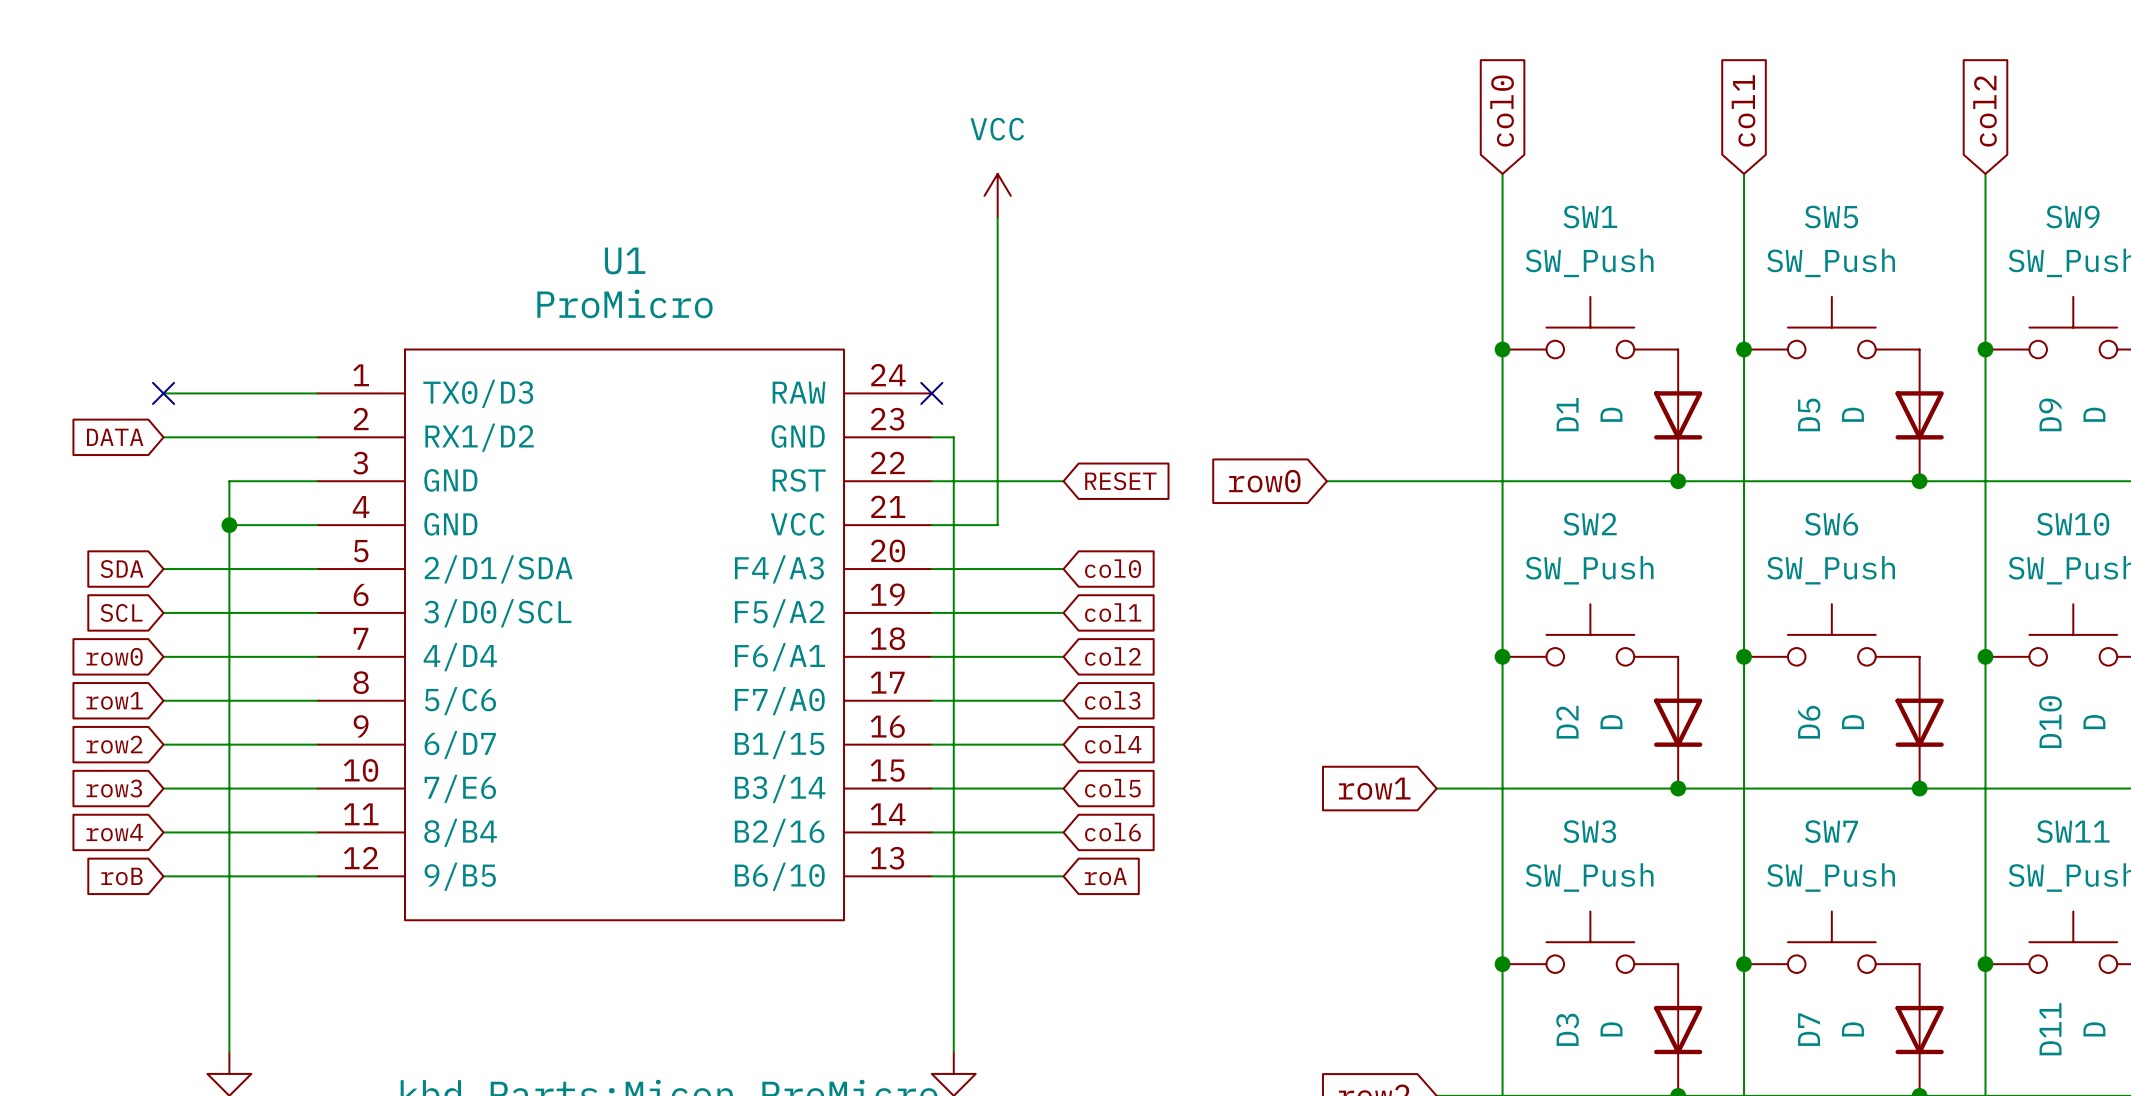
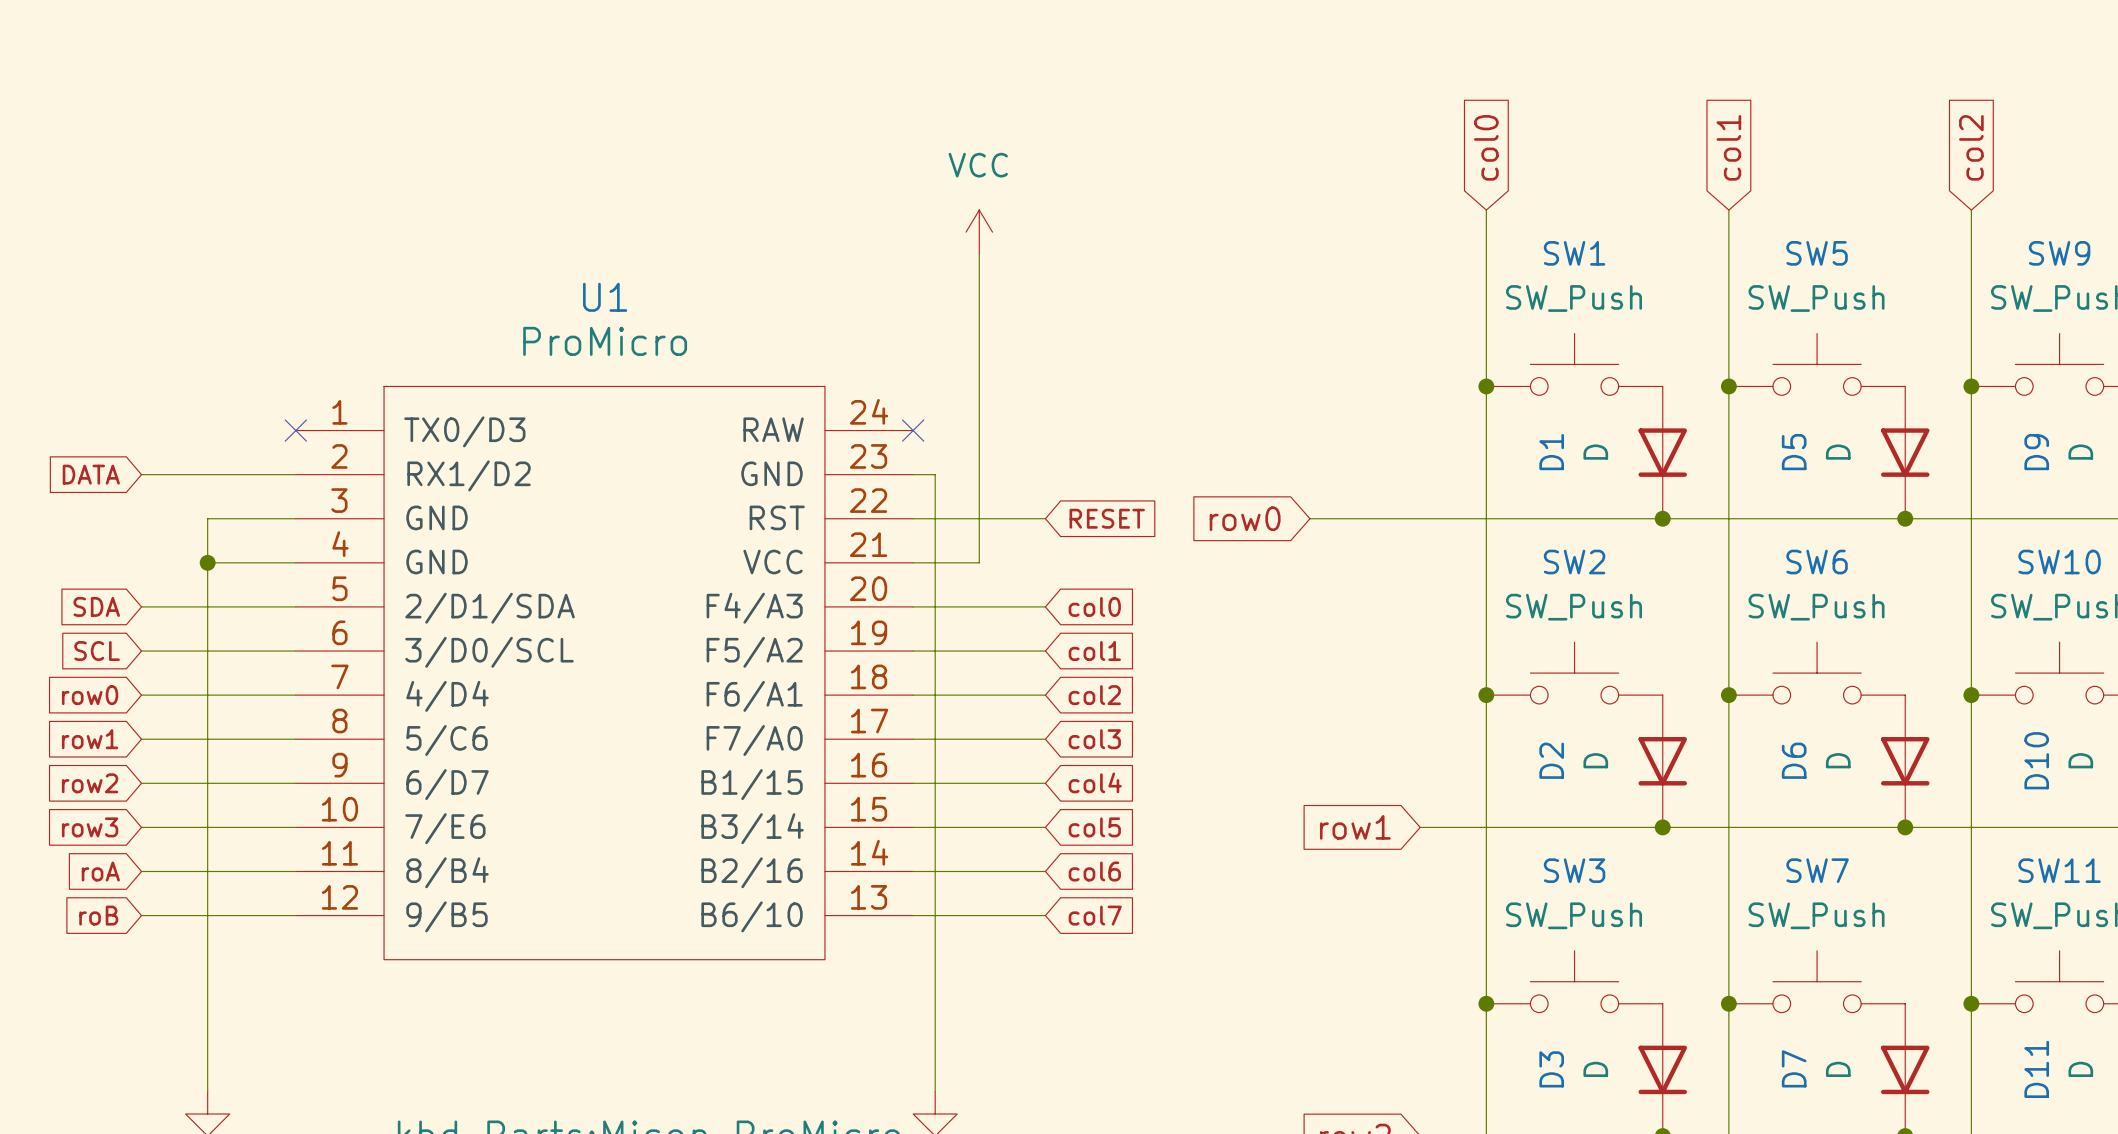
wire: (163, 393) (317, 393) -> none
no-connect mark: (163, 393) -> none
no-connect mark: none -> (295, 430)
global label: row4 (114, 832) -> roA (100, 871)
global label: roA (1105, 876) -> col7 (1095, 915)

